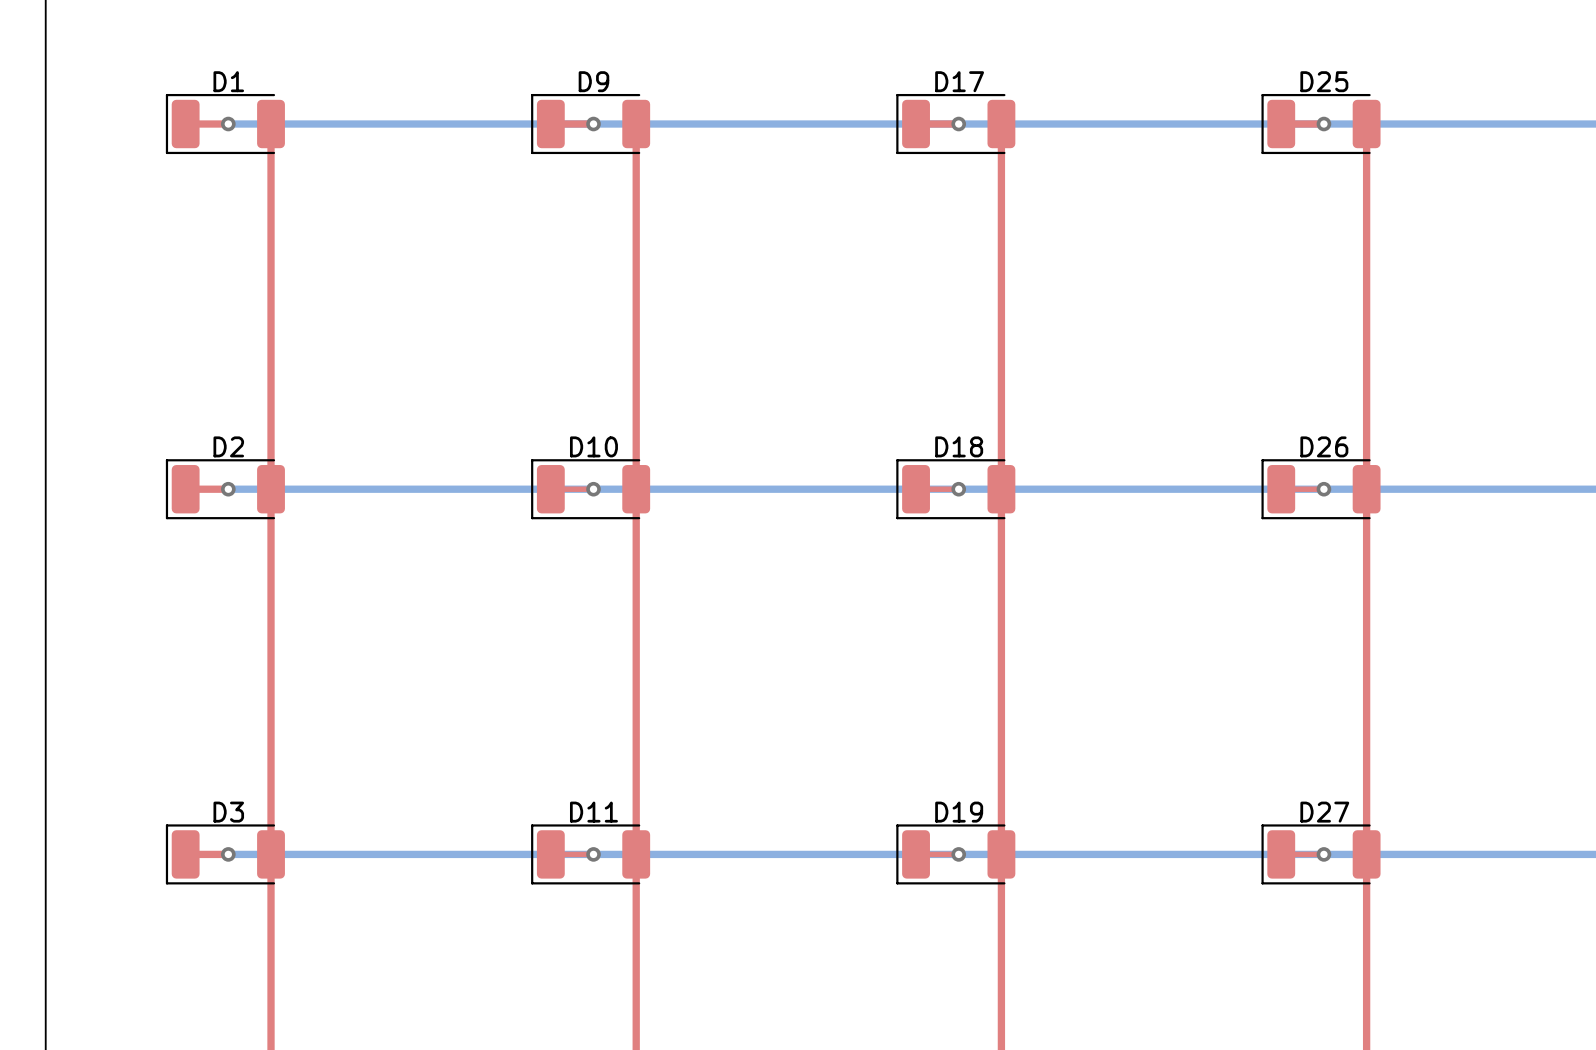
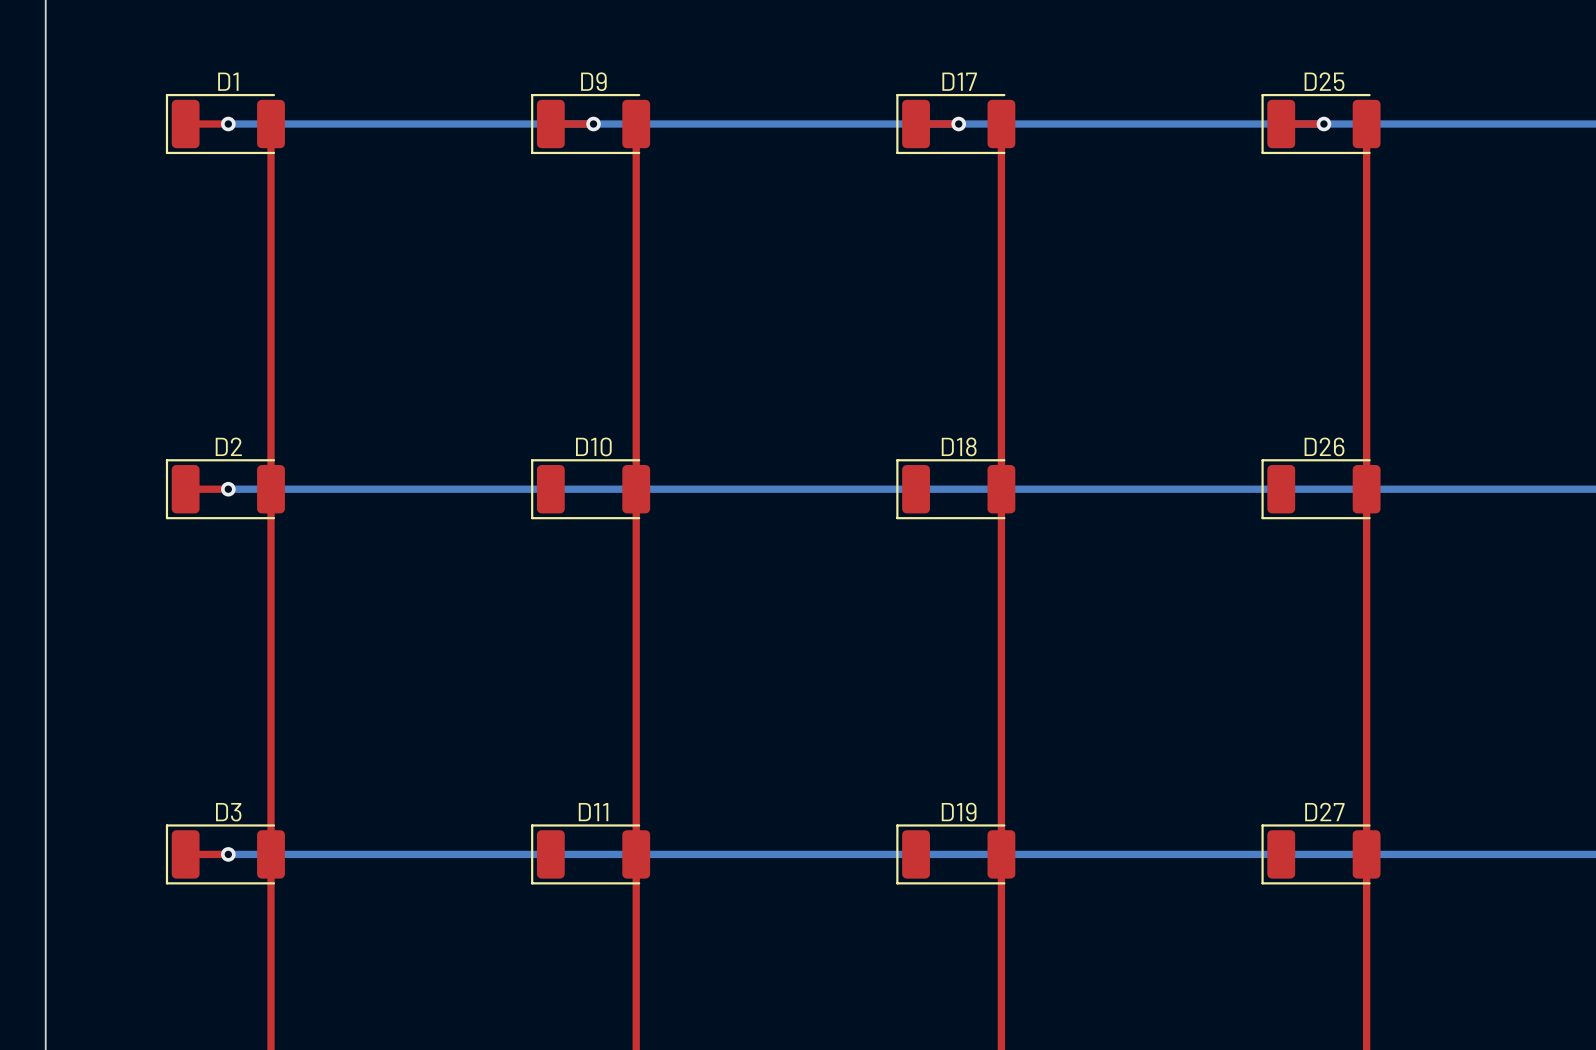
top track: (550, 489) (593, 489) -> none
via: (593, 489) -> none
top track: (916, 489) (958, 489) -> none
via: (958, 489) -> none
top track: (1281, 489) (1323, 489) -> none
via: (1323, 489) -> none
top track: (550, 854) (593, 854) -> none
via: (593, 854) -> none
top track: (916, 854) (958, 854) -> none
via: (958, 854) -> none
top track: (1281, 854) (1323, 854) -> none
via: (1323, 854) -> none

